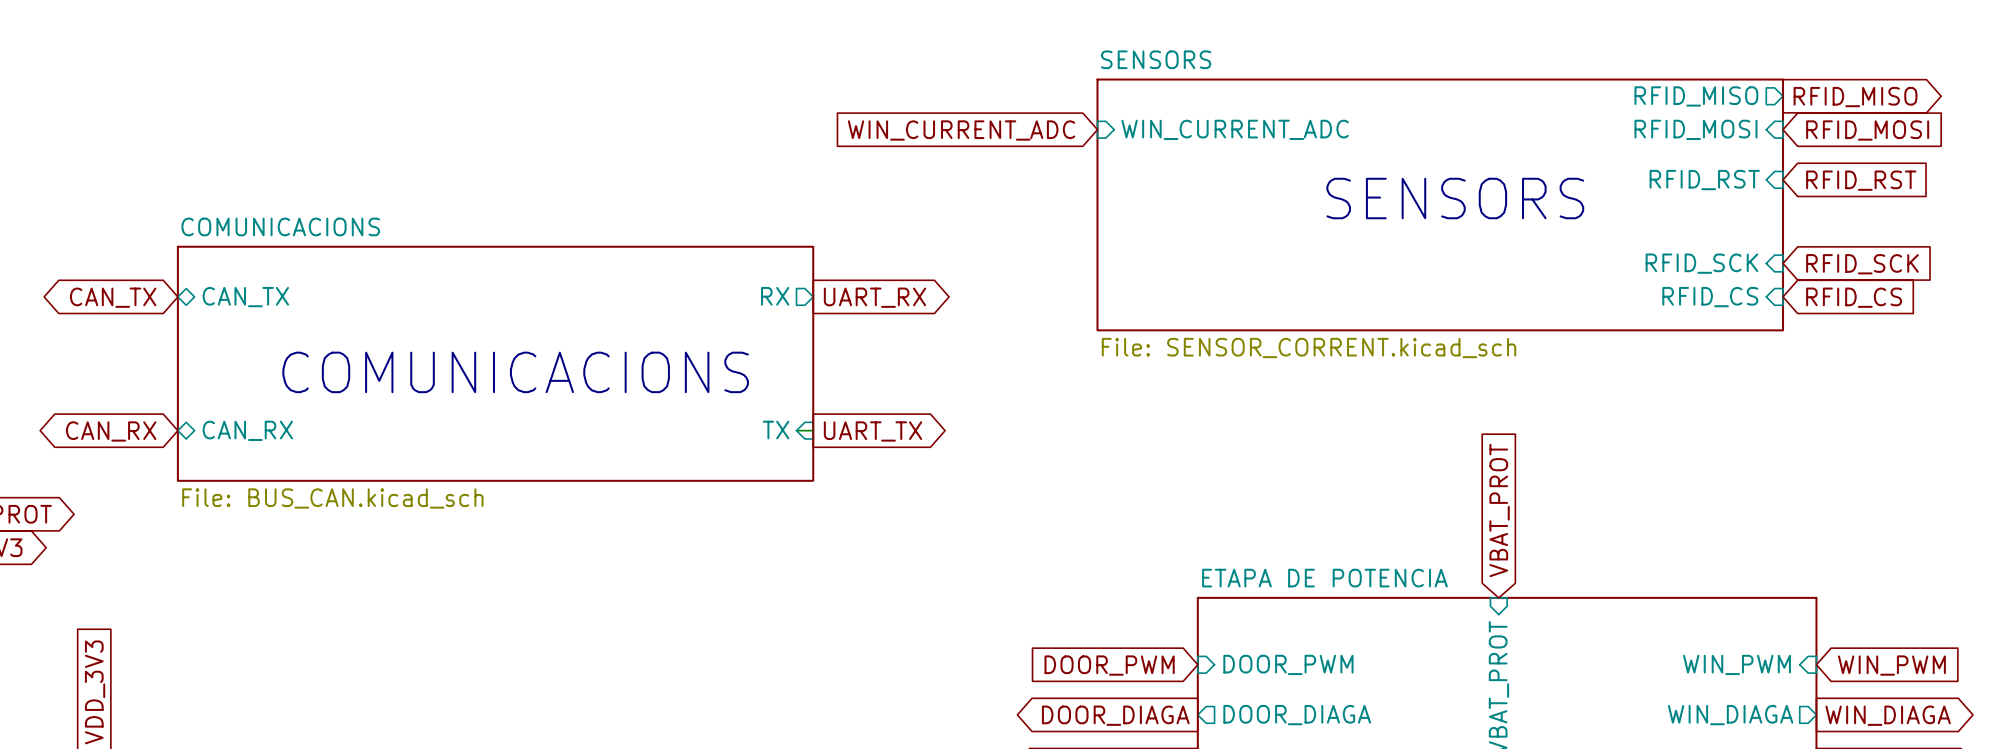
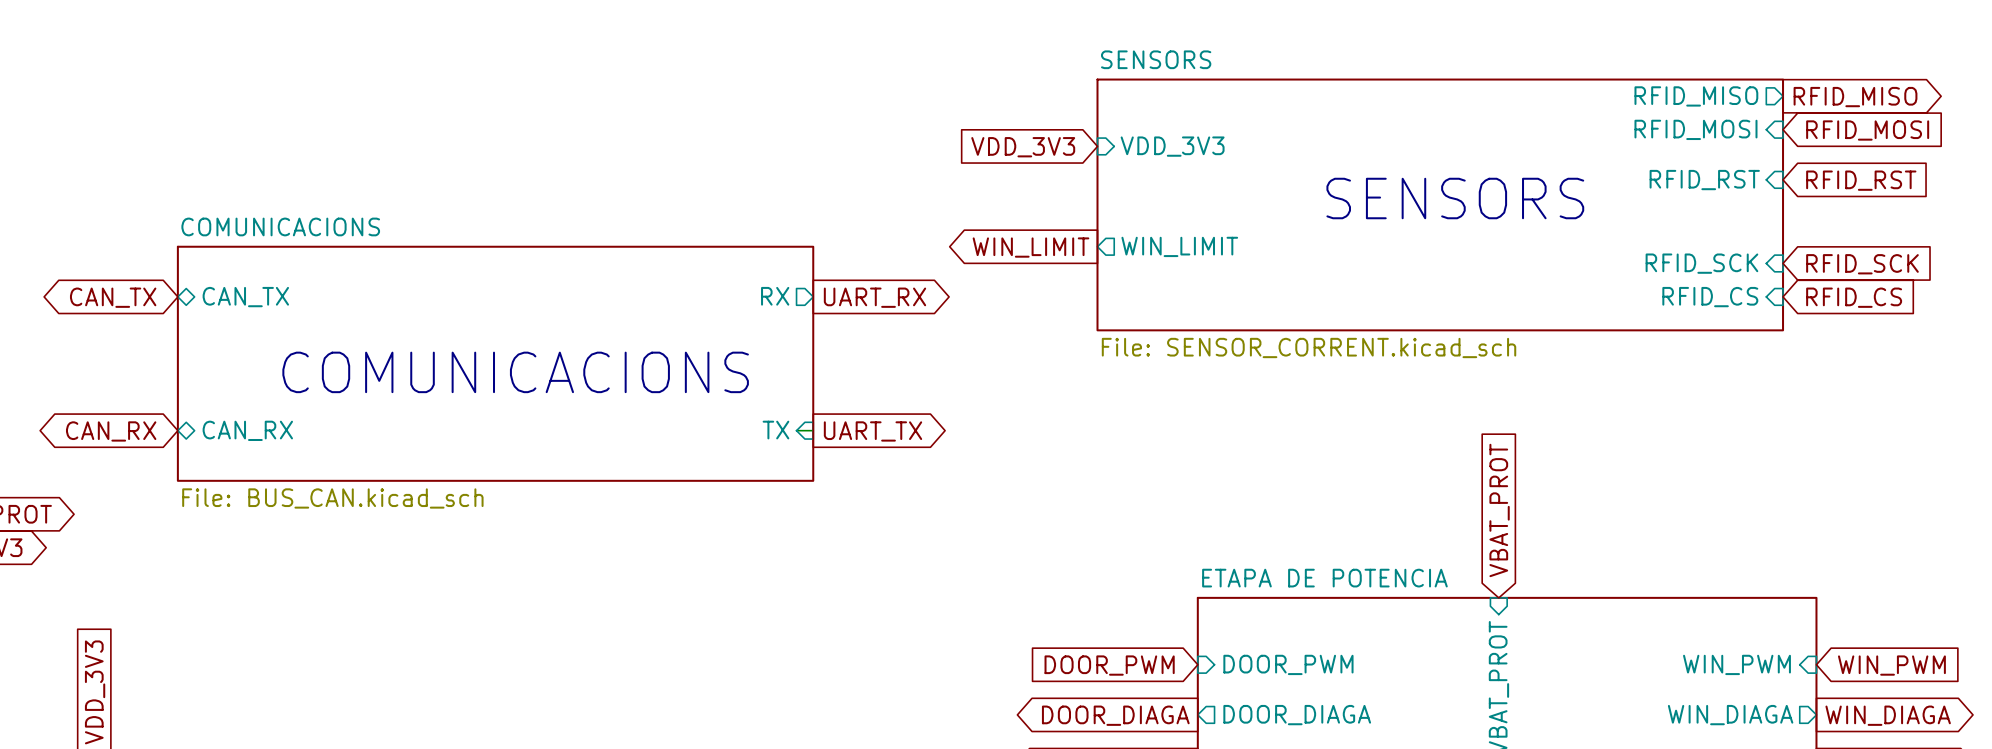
sheet pin: WIN_CURRENT_ADC (1235, 129) -> none
global label: WIN_CURRENT_ADC (961, 130) -> none
sheet pin: none -> VDD_3V3 (1172, 146)
global label: none -> VDD_3V3 (1023, 147)
sheet pin: none -> WIN_LIMIT (1179, 246)
global label: none -> WIN_LIMIT (1030, 247)

